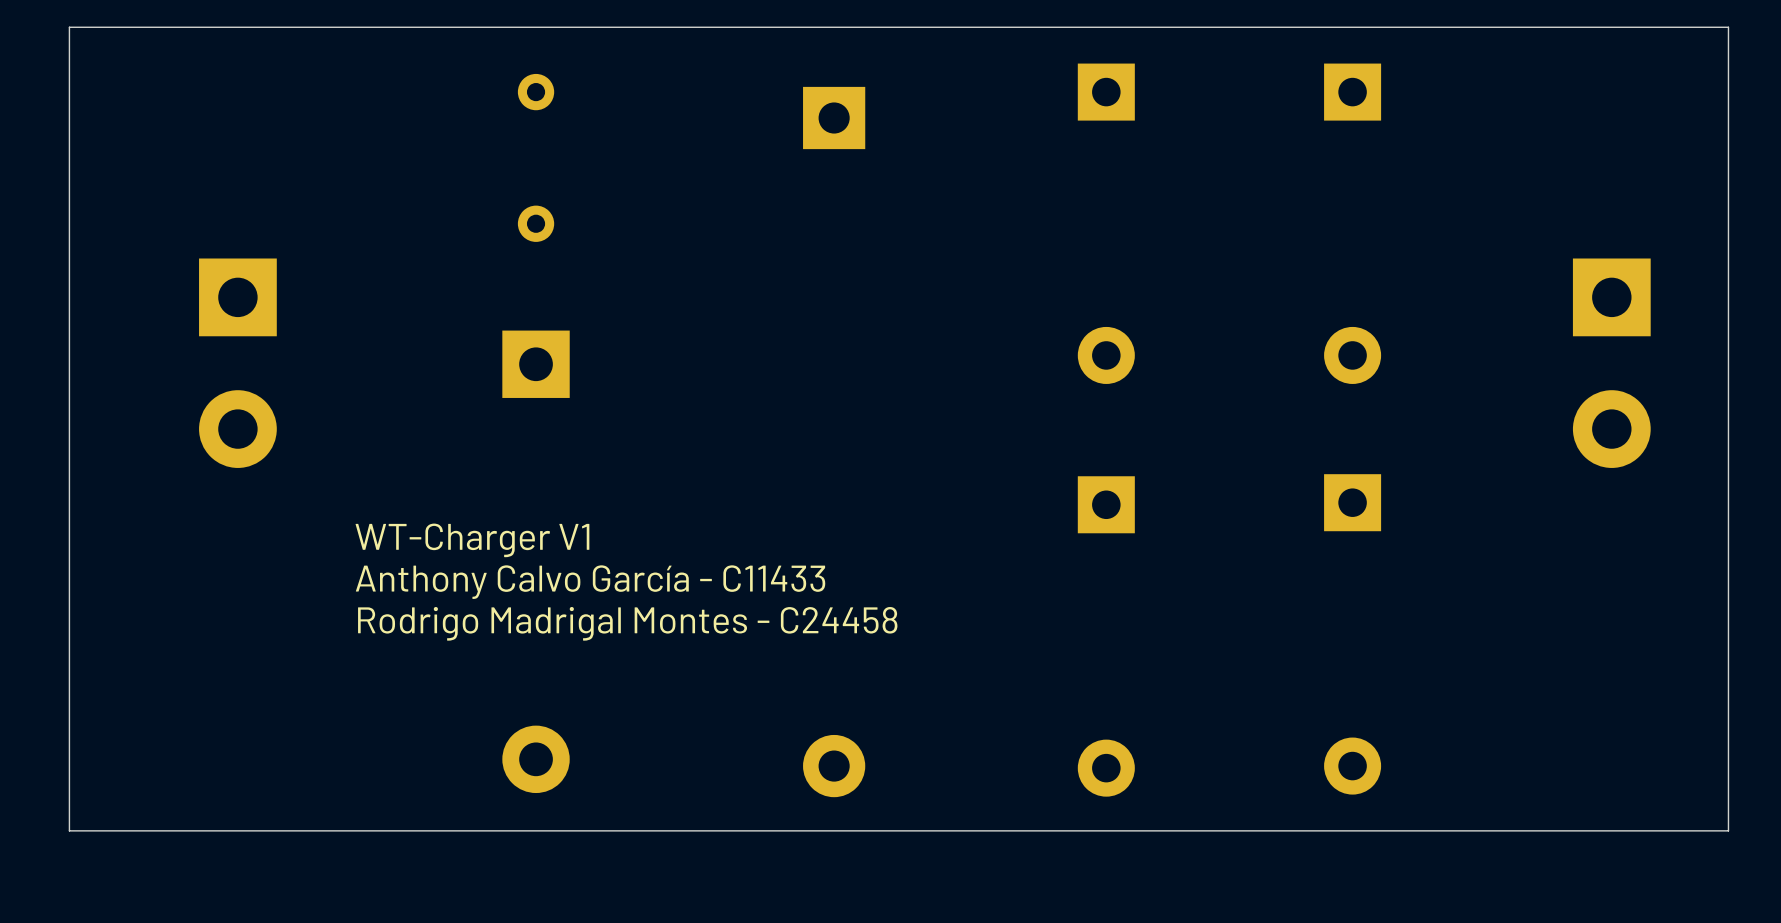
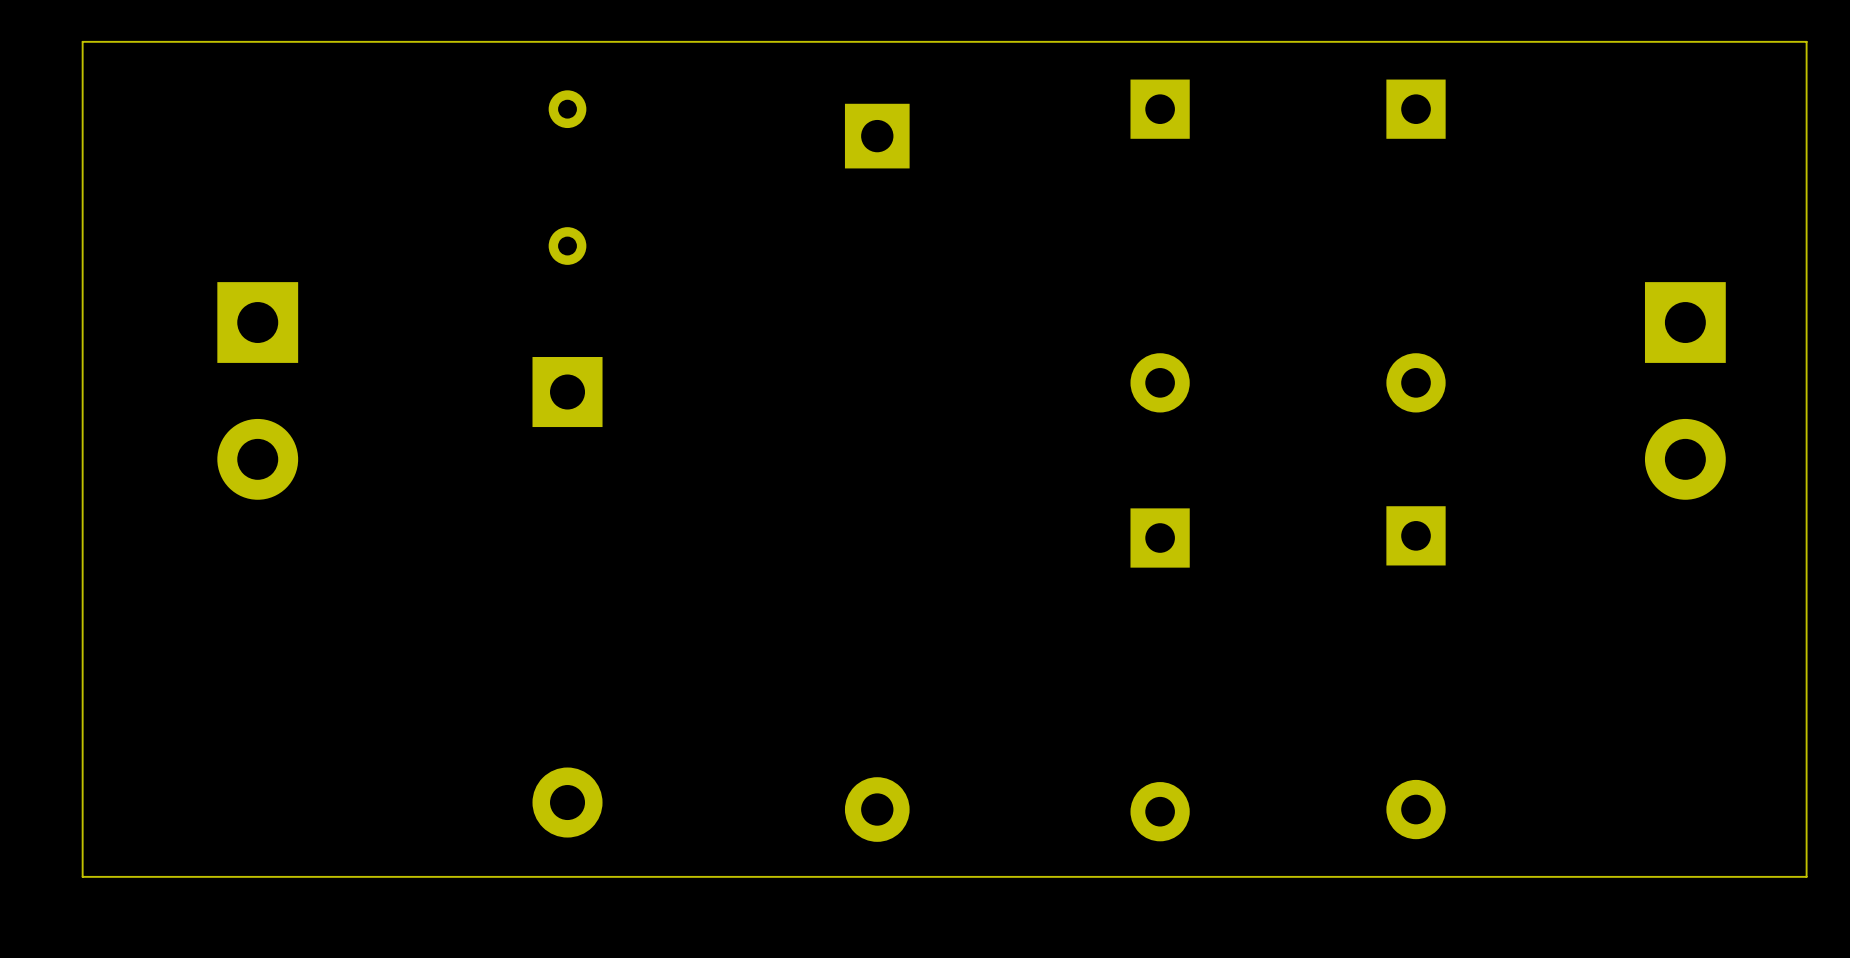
text: WT-Charger V1 (472, 540) -> none
text: Anthony Calvo García - C11433 (590, 582) -> none
text: Rodrigo Madrigal Montes - C24458 (627, 623) -> none

